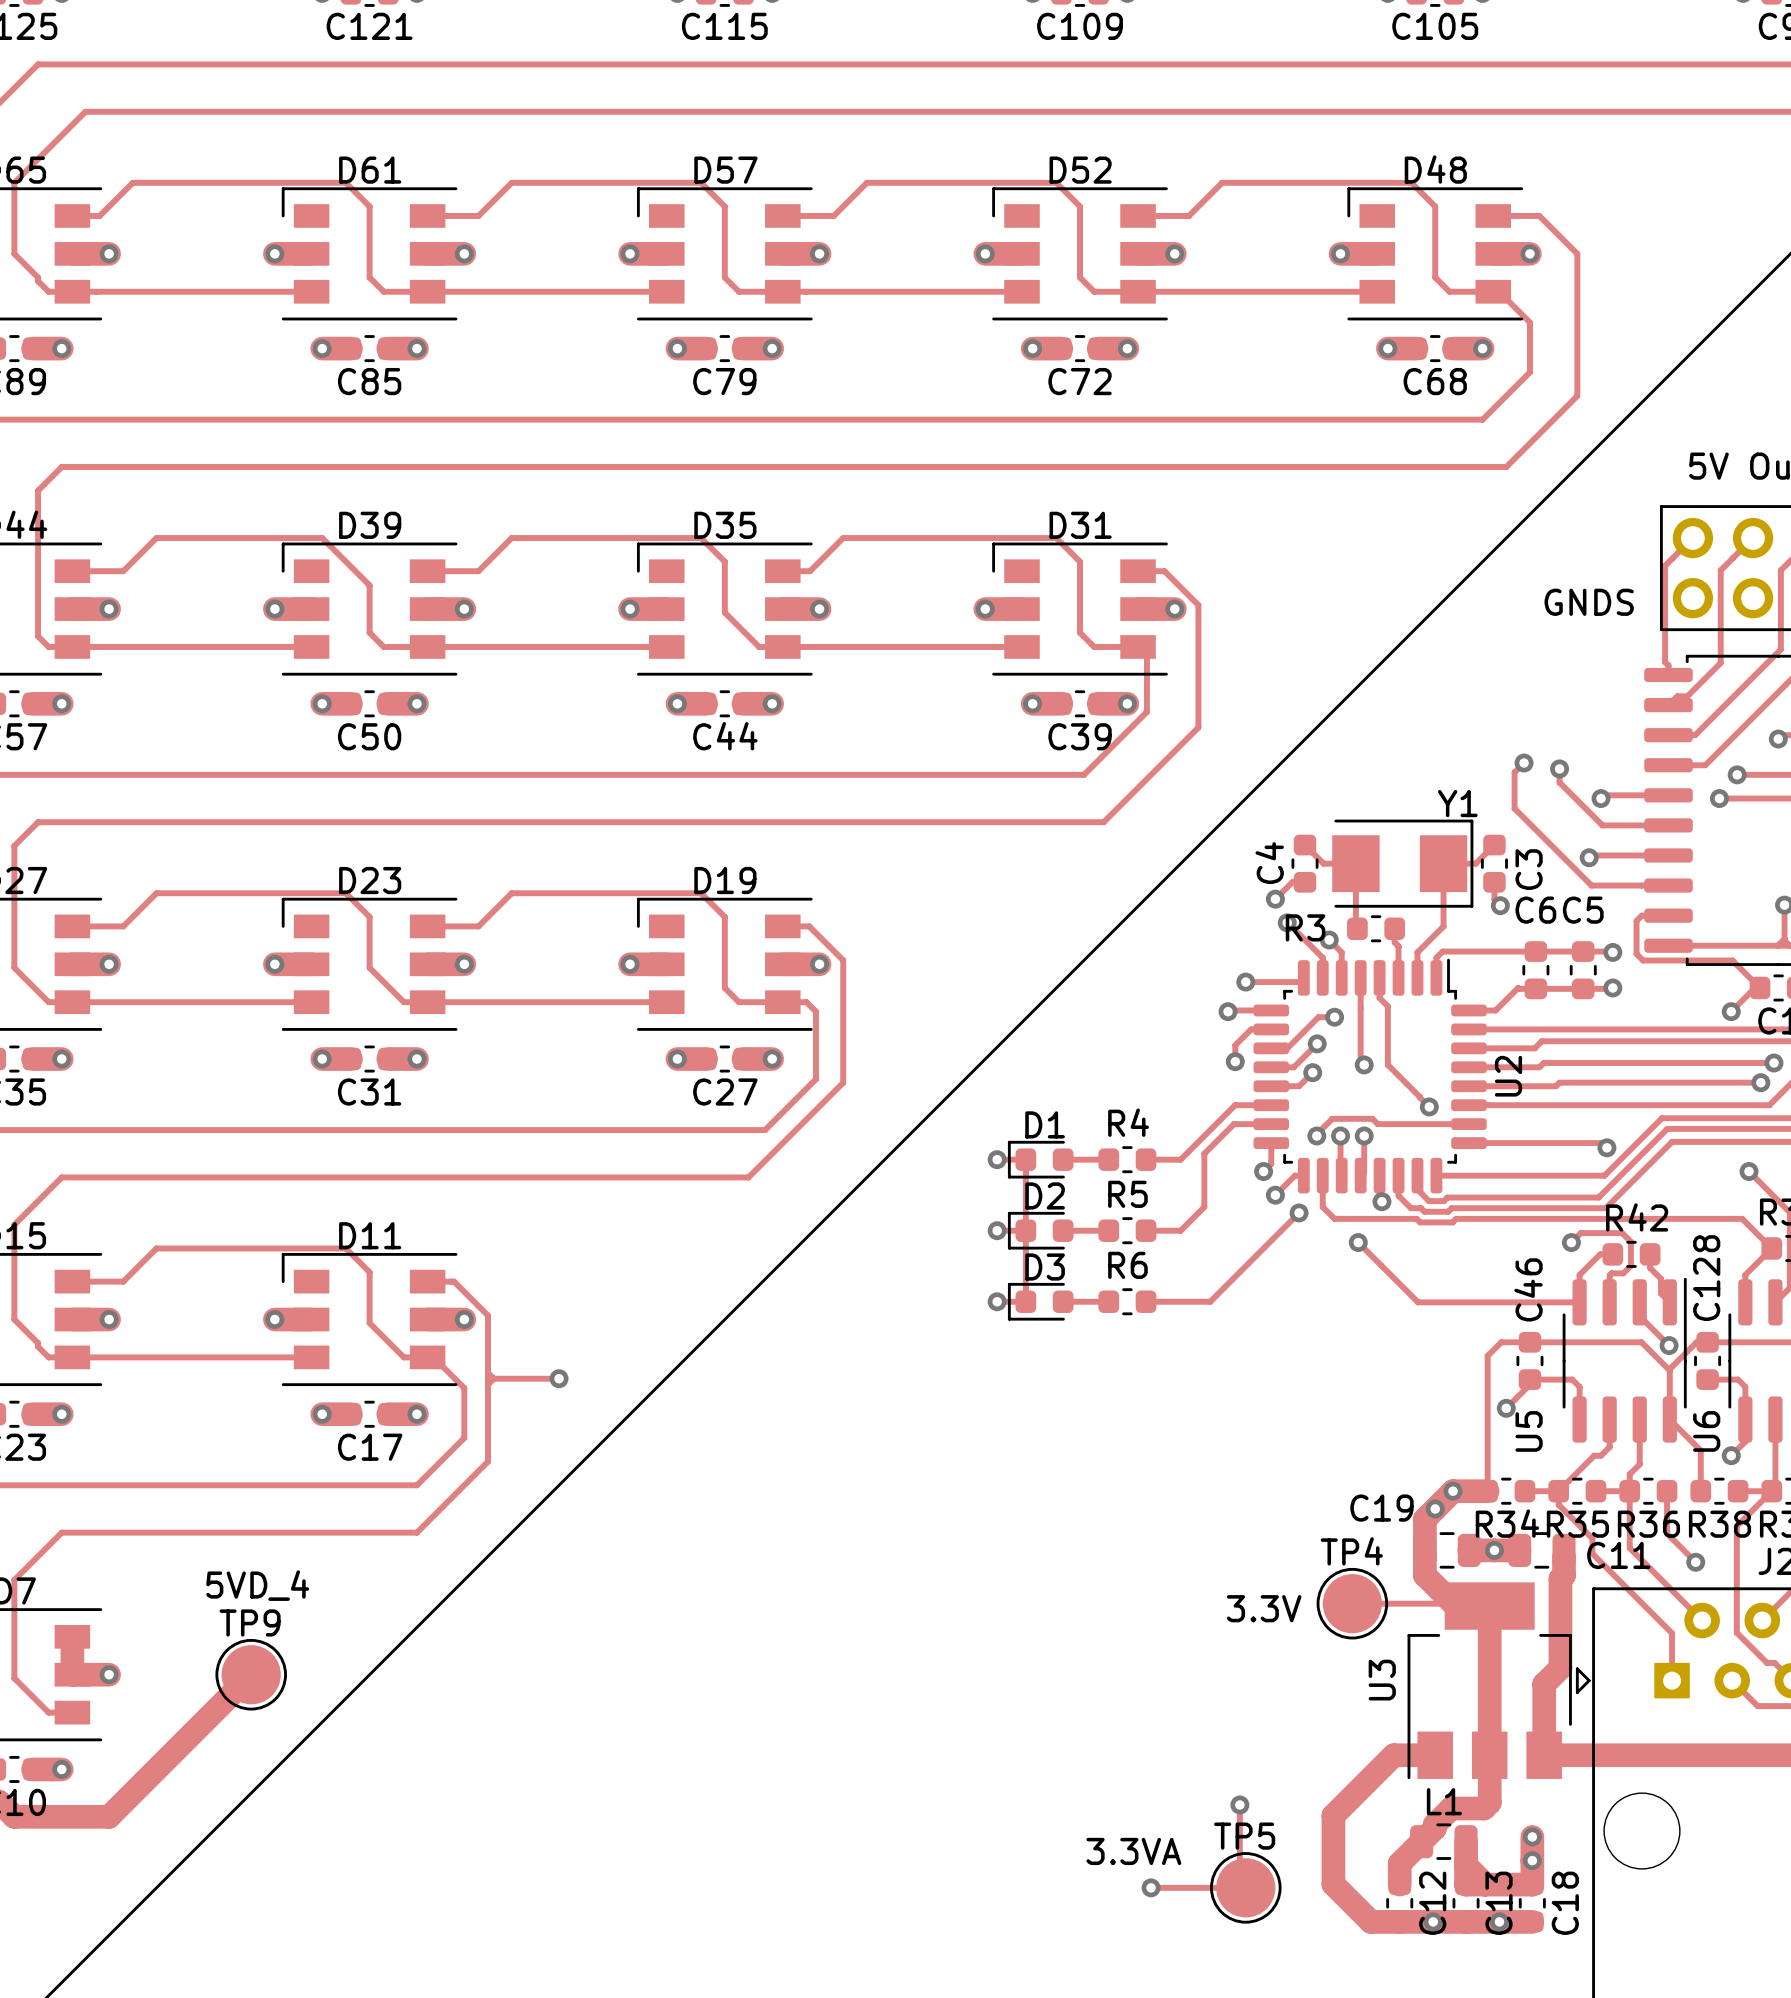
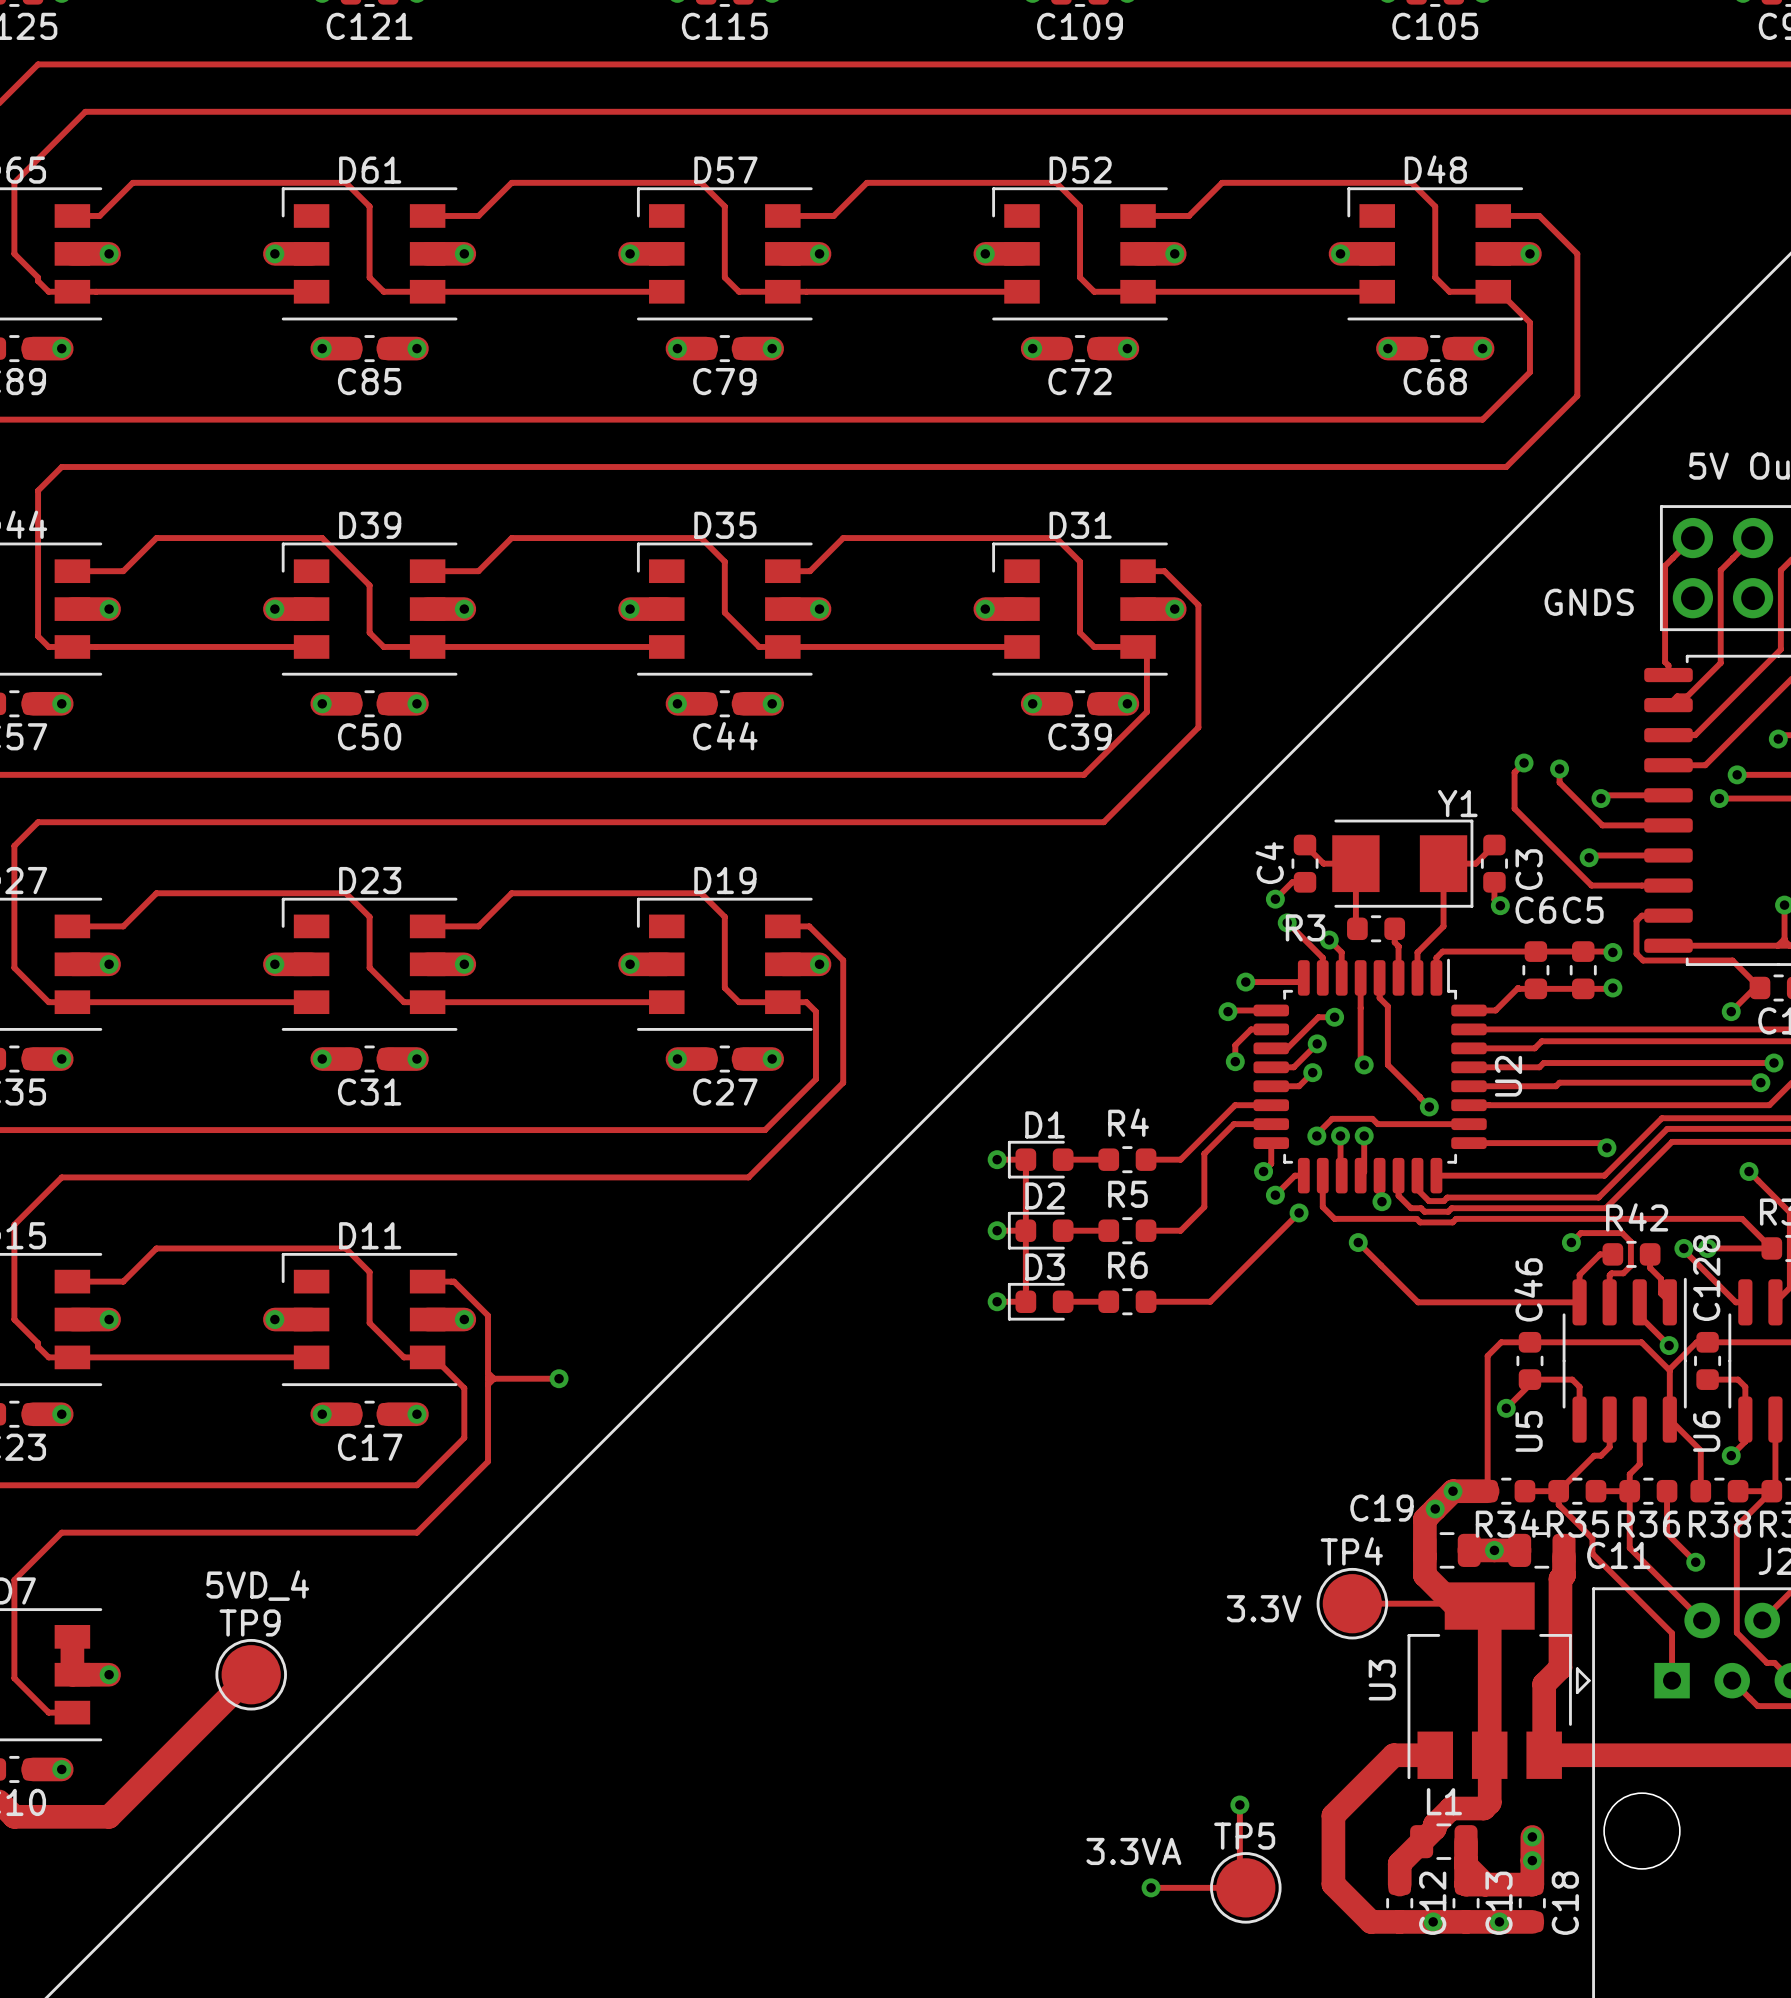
track: none -> (1683, 1248) (1735, 1302) (1745, 1302)
via: none -> (1683, 1248)
via: none -> (1707, 1248)
track: (1771, 1248) (1745, 1274) (1745, 1302) -> (1771, 1248) (1707, 1248)

